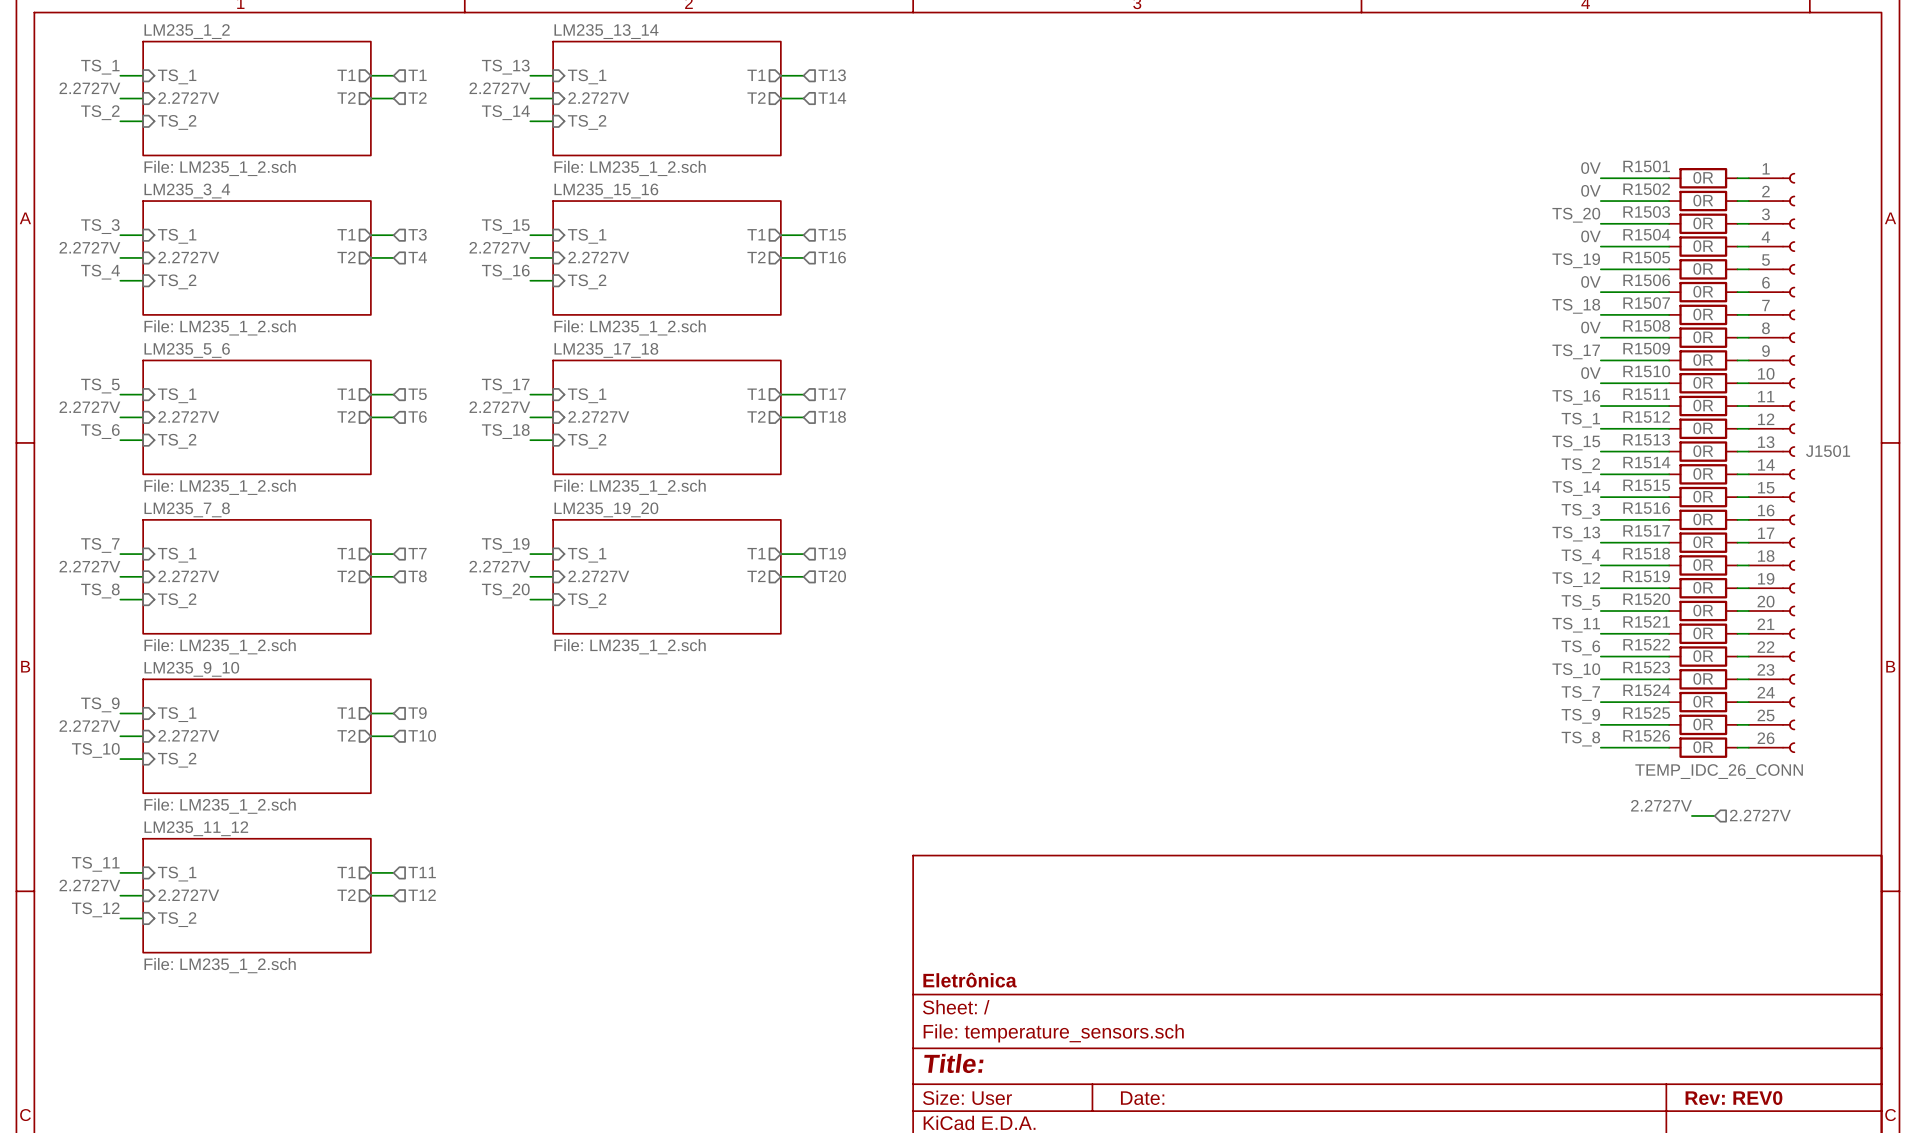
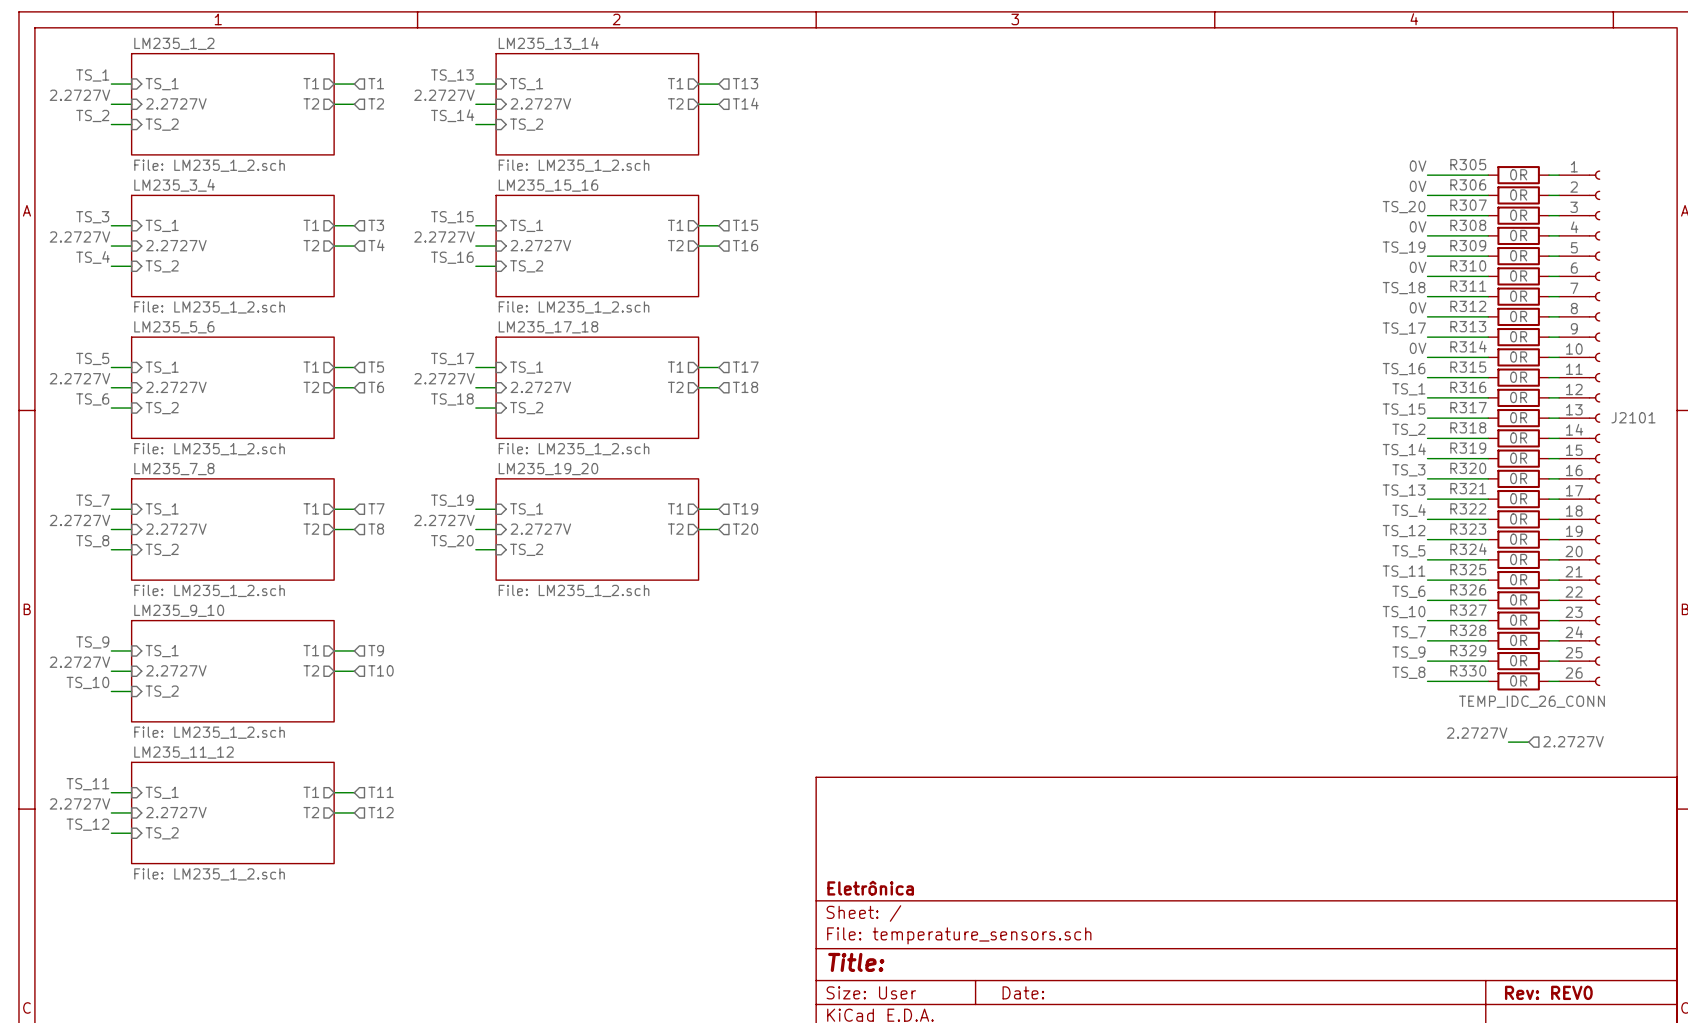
R1501 name: R1501 (1646, 166) -> R305 (1468, 164)
R1502 name: R1502 (1646, 189) -> R306 (1468, 184)
R1503 name: R1503 (1646, 211) -> R307 (1468, 205)
R1504 name: R1504 (1646, 234) -> R308 (1468, 225)
R1505 name: R1505 (1646, 257) -> R309 (1468, 245)
R1506 name: R1506 (1646, 280) -> R310 (1468, 265)
R1507 name: R1507 (1646, 303) -> R311 (1468, 286)
R1508 name: R1508 (1646, 325) -> R312 (1468, 306)
R1509 name: R1509 (1646, 348) -> R313 (1468, 326)
R1510 name: R1510 (1646, 371) -> R314 (1468, 346)
R1511 name: R1511 (1646, 394) -> R315 (1468, 367)
R1512 name: R1512 (1646, 416) -> R316 (1468, 387)
R1513 name: R1513 (1646, 439) -> R317 (1468, 407)
J1501 name: J1501 (1828, 451) -> J2101 (1633, 417)
R1514 name: R1514 (1646, 462) -> R318 (1468, 427)
R1515 name: R1515 (1646, 485) -> R319 (1468, 448)
R1516 name: R1516 (1646, 508) -> R320 (1468, 468)
R1517 name: R1517 (1646, 530) -> R321 (1468, 488)
R1518 name: R1518 (1646, 553) -> R322 (1468, 508)
R1519 name: R1519 (1646, 576) -> R323 (1468, 529)
R1520 name: R1520 (1646, 599) -> R324 (1468, 549)
R1521 name: R1521 (1646, 621) -> R325 (1468, 569)
R1522 name: R1522 (1646, 644) -> R326 (1468, 589)
R1523 name: R1523 (1646, 667) -> R327 (1468, 610)
R1524 name: R1524 (1646, 690) -> R328 (1468, 630)
R1525 name: R1525 (1646, 713) -> R329 (1468, 650)
R1526 name: R1526 (1646, 735) -> R330 (1468, 670)

